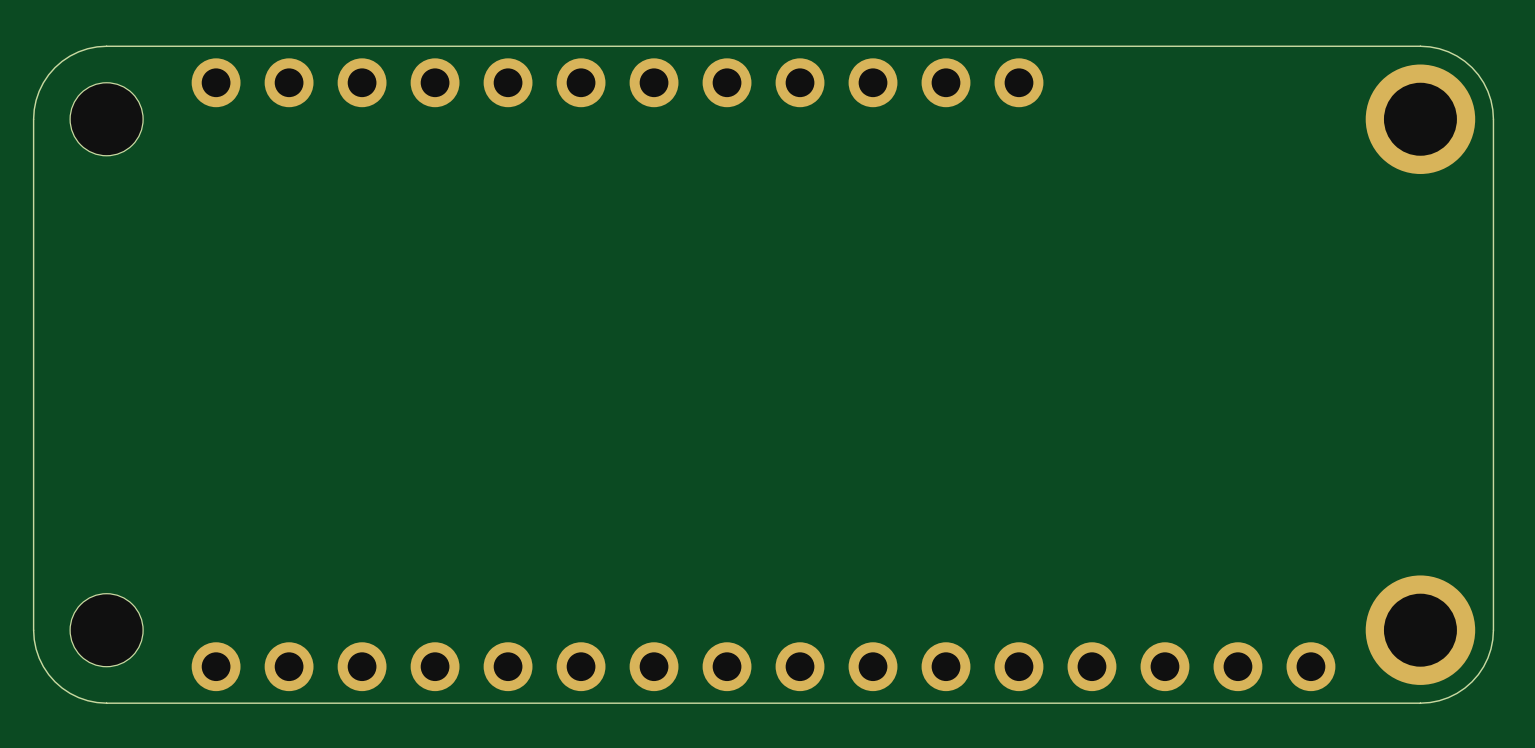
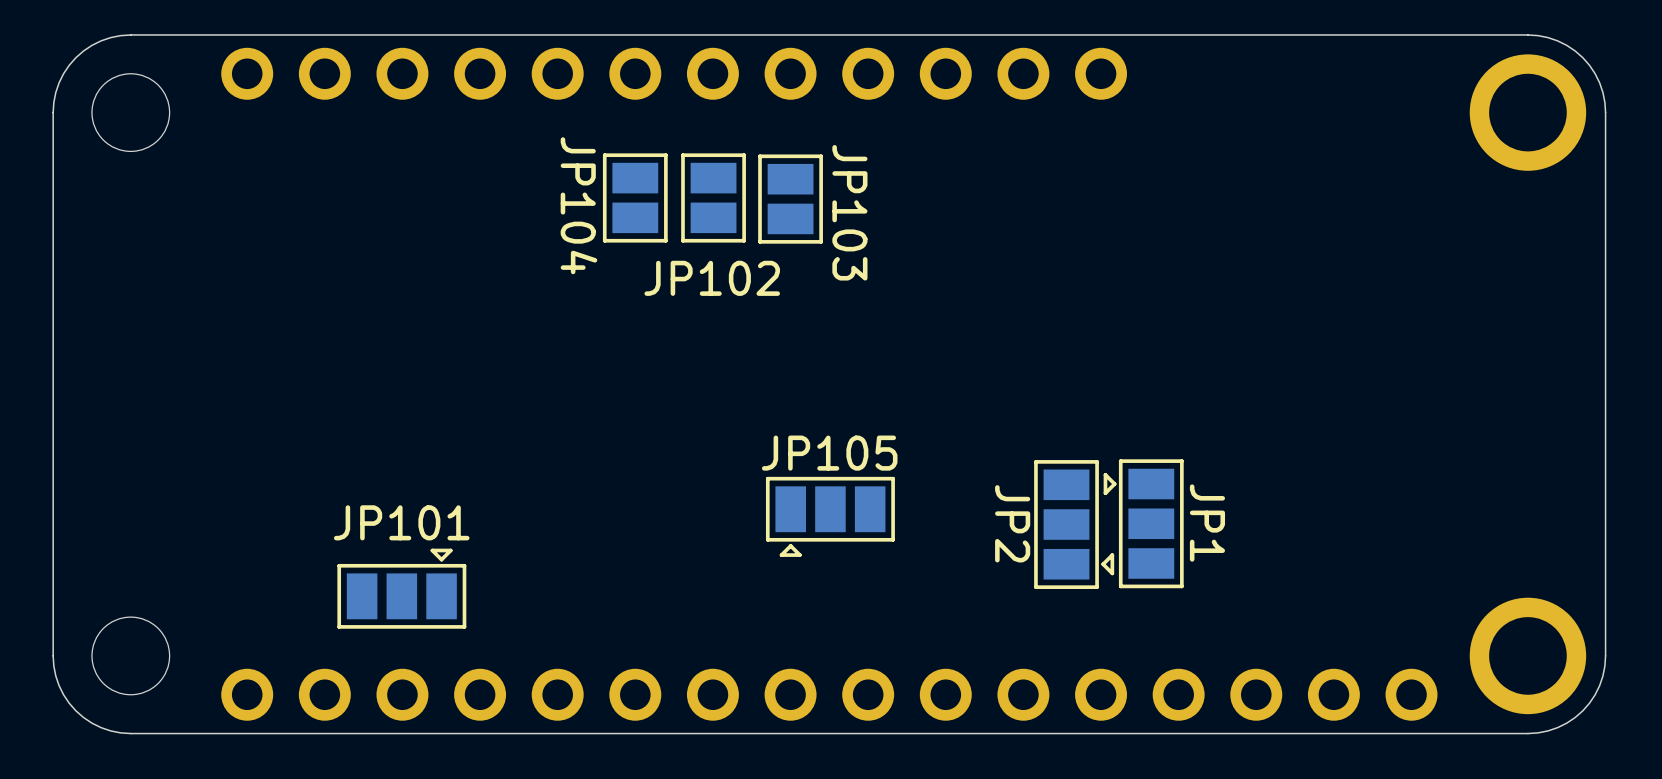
JP104: none -> (635, 197)
JP102: none -> (713, 197)
JP103: none -> (790, 199)
JP105: none -> (830, 516)
JP1: none -> (1143, 523)
JP2: none -> (1074, 524)
JP101: none -> (401, 588)

